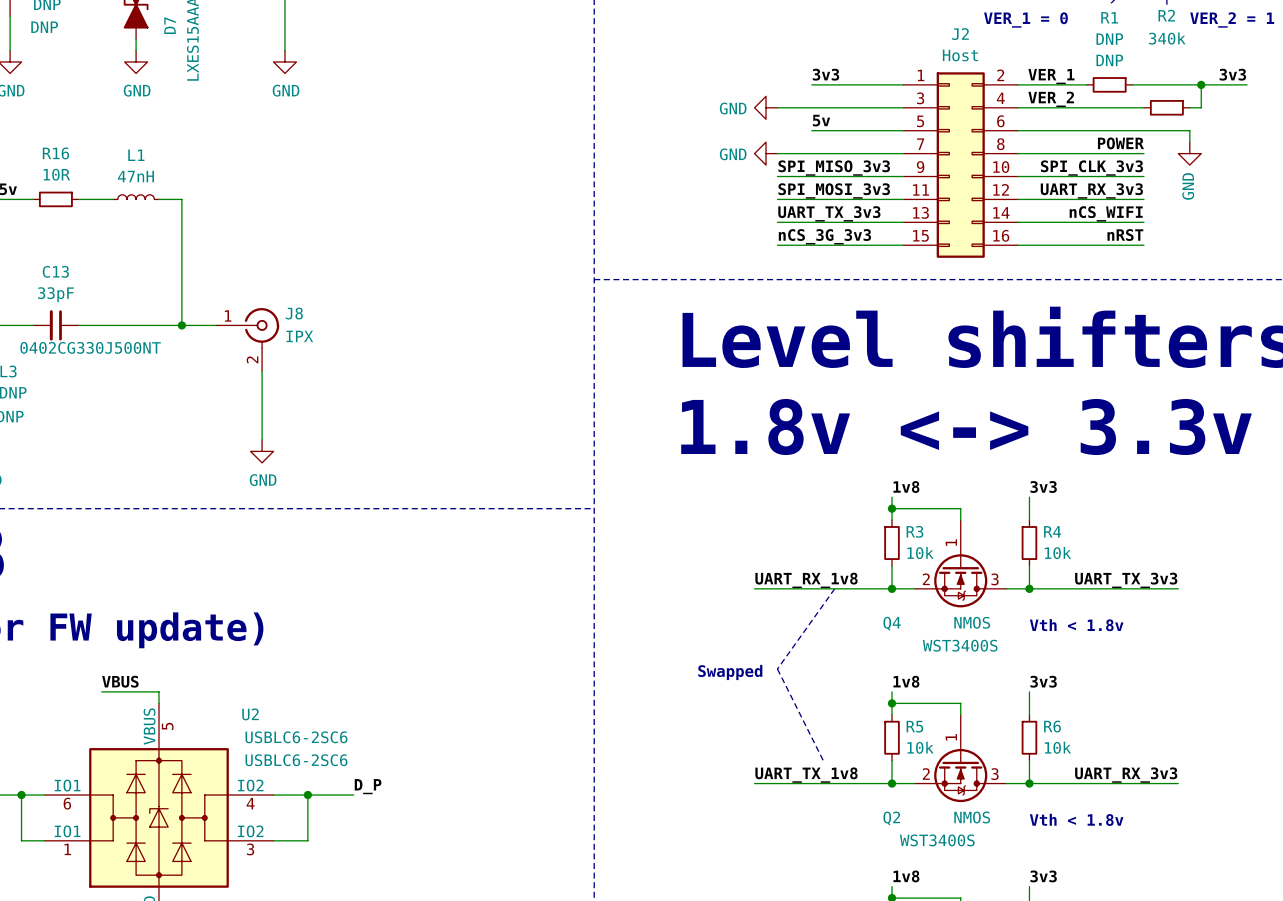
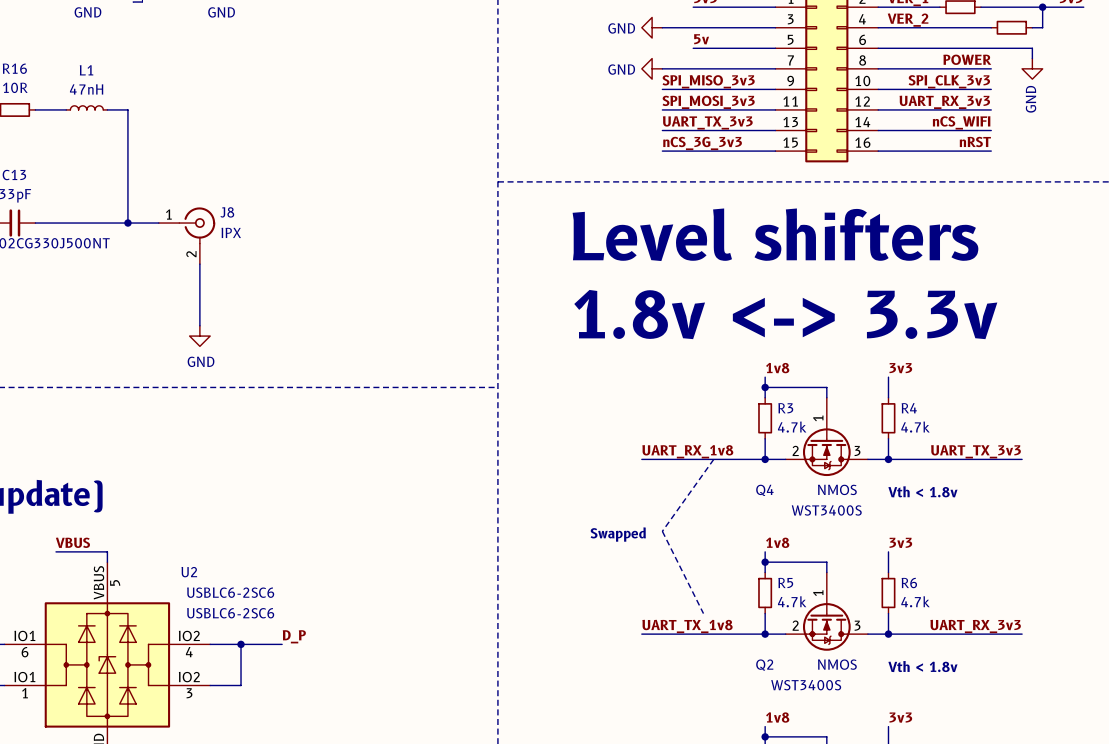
R3 value: 10k (920, 553) -> 4.7k (792, 427)
R4 value: 10k (1057, 553) -> 4.7k (915, 427)
R5 value: 10k (920, 747) -> 4.7k (792, 601)
R6 value: 10k (1057, 747) -> 4.7k (915, 601)

